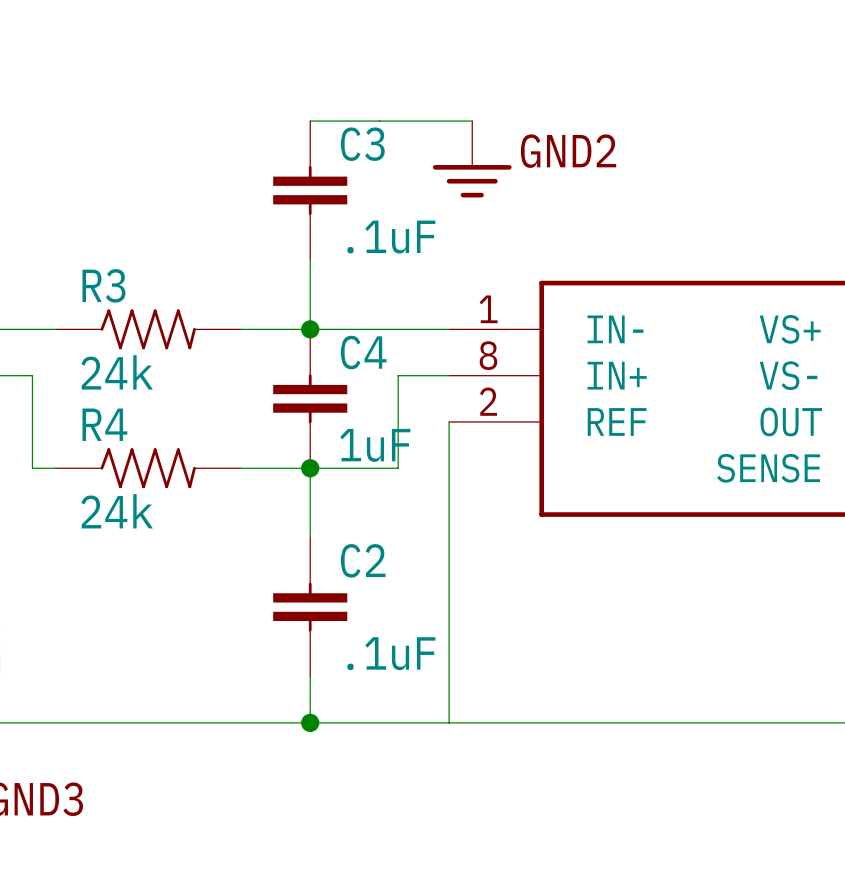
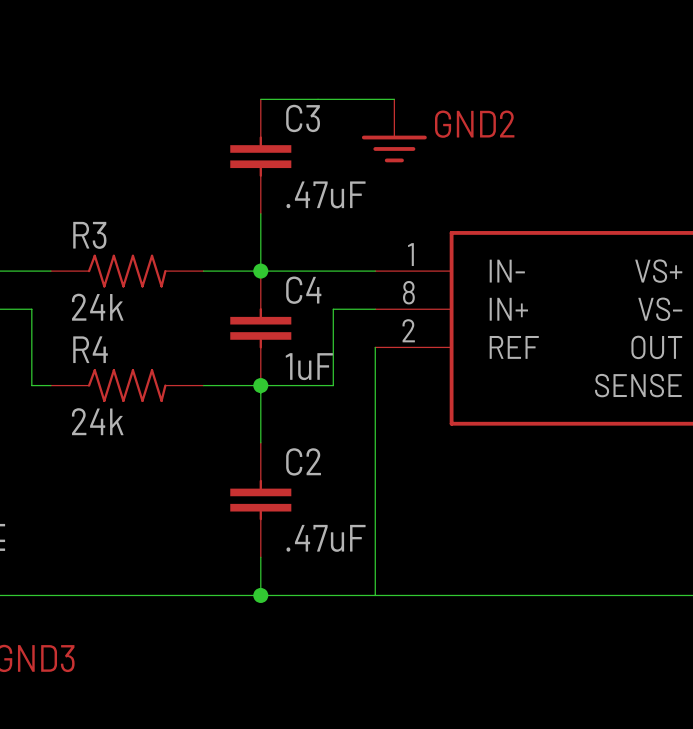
C3 value: .1uF (391, 237) -> .47uF (326, 194)
C2 value: .1uF (391, 653) -> .47uF (326, 538)

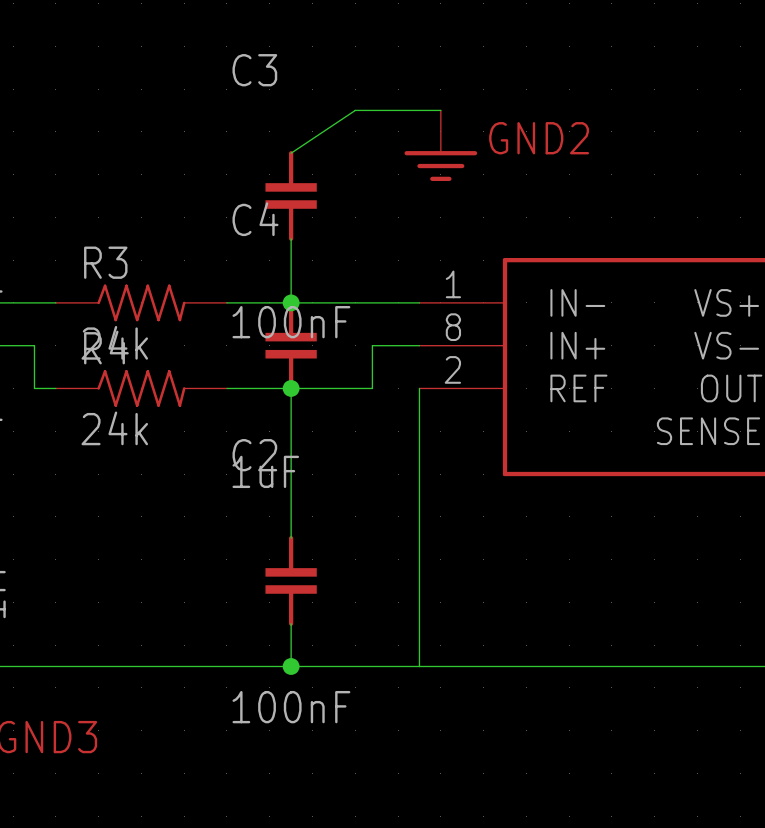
C3 symbol: [230, 99, 292, 214] -> [265, 151, 317, 241]
wire: (260, 99) (318, 99) -> (291, 153) (355, 110)
C3 name position: C3 (303, 118) -> C3 (254, 70)
C3 value: .47uF (326, 194) -> 100nF (291, 322)
C4 symbol: [230, 271, 292, 386] -> [265, 300, 317, 391]
C4 name position: C4 (303, 290) -> C4 (255, 219)
wire: (31, 347) (31, 385) (50, 385) -> (34, 388) (55, 388)
wire: (333, 347) (333, 385) (203, 385) -> (372, 388) (226, 388)
C4 value position: 1uF (309, 366) -> 1uF (265, 471)
R4 position: (127, 385) -> (141, 388)
junction position: (260, 385) -> (291, 388)
C2 symbol: [230, 442, 292, 558] -> [265, 536, 317, 626]
C2 name position: C2 (303, 461) -> C2 (254, 455)
C2 value: .47uF (326, 538) -> 100nF (291, 707)

